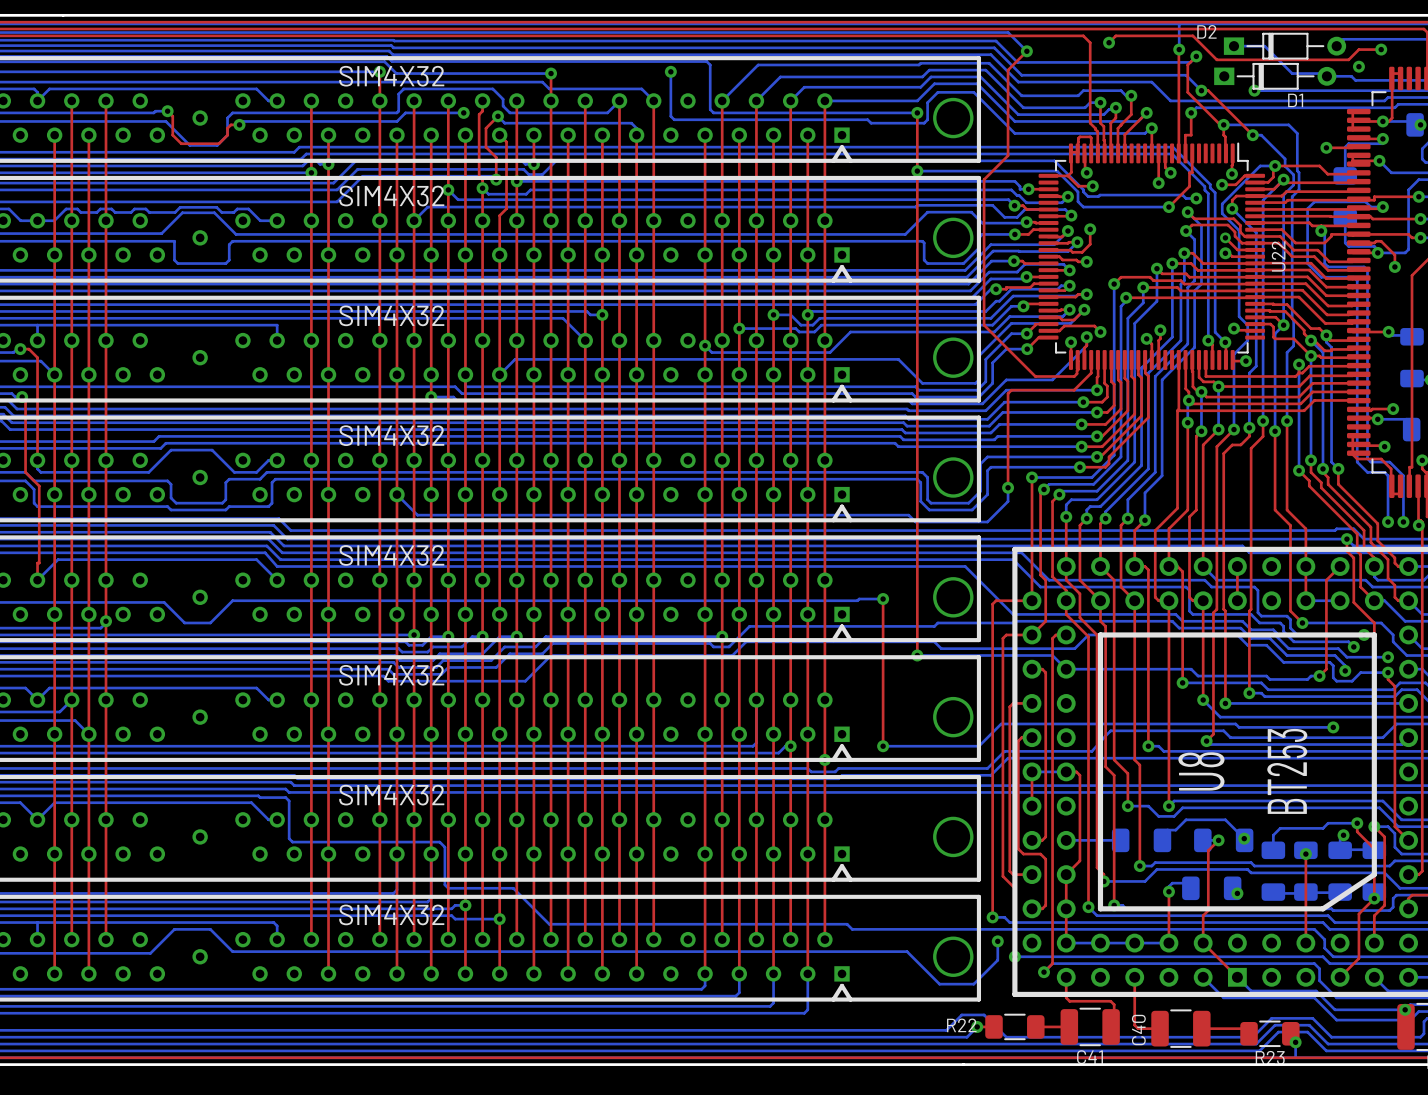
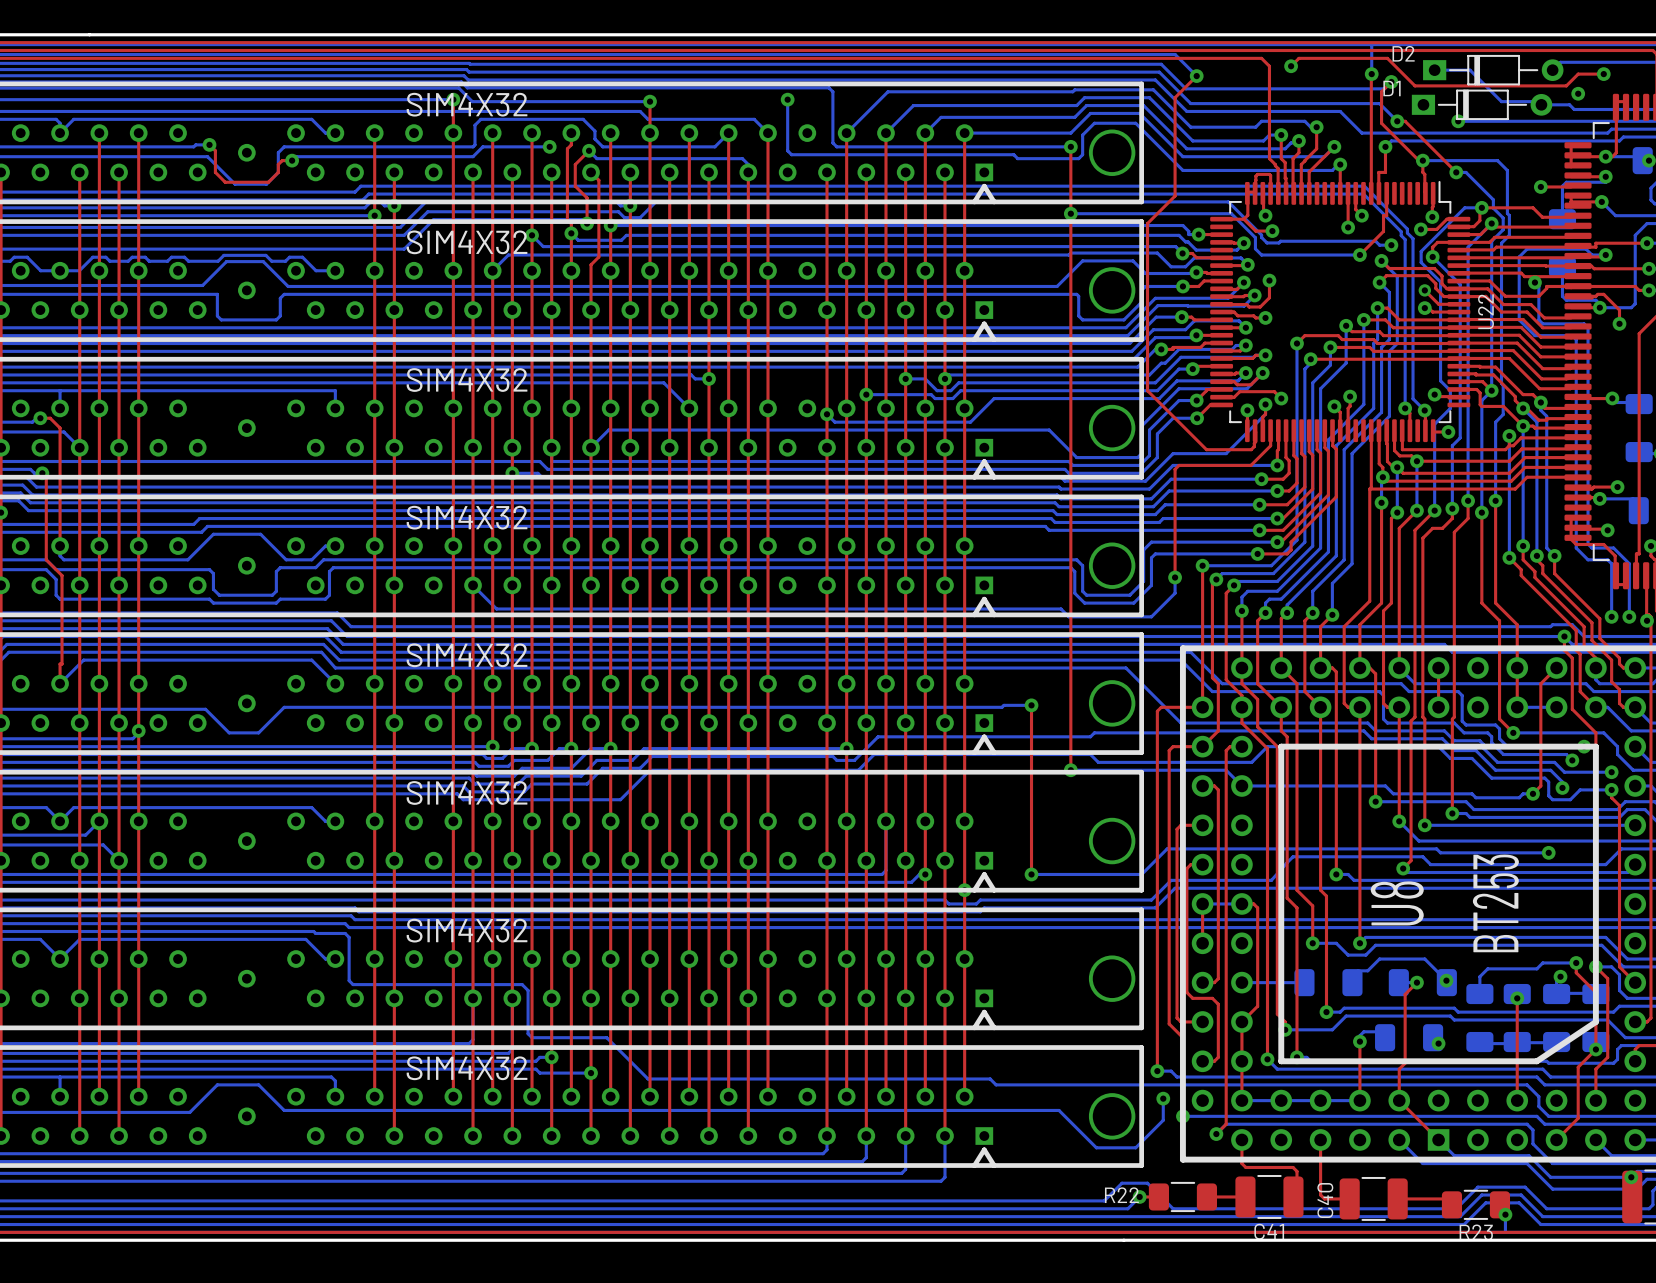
D1 name position: D1 (1295, 100) -> D1 (1392, 88)

